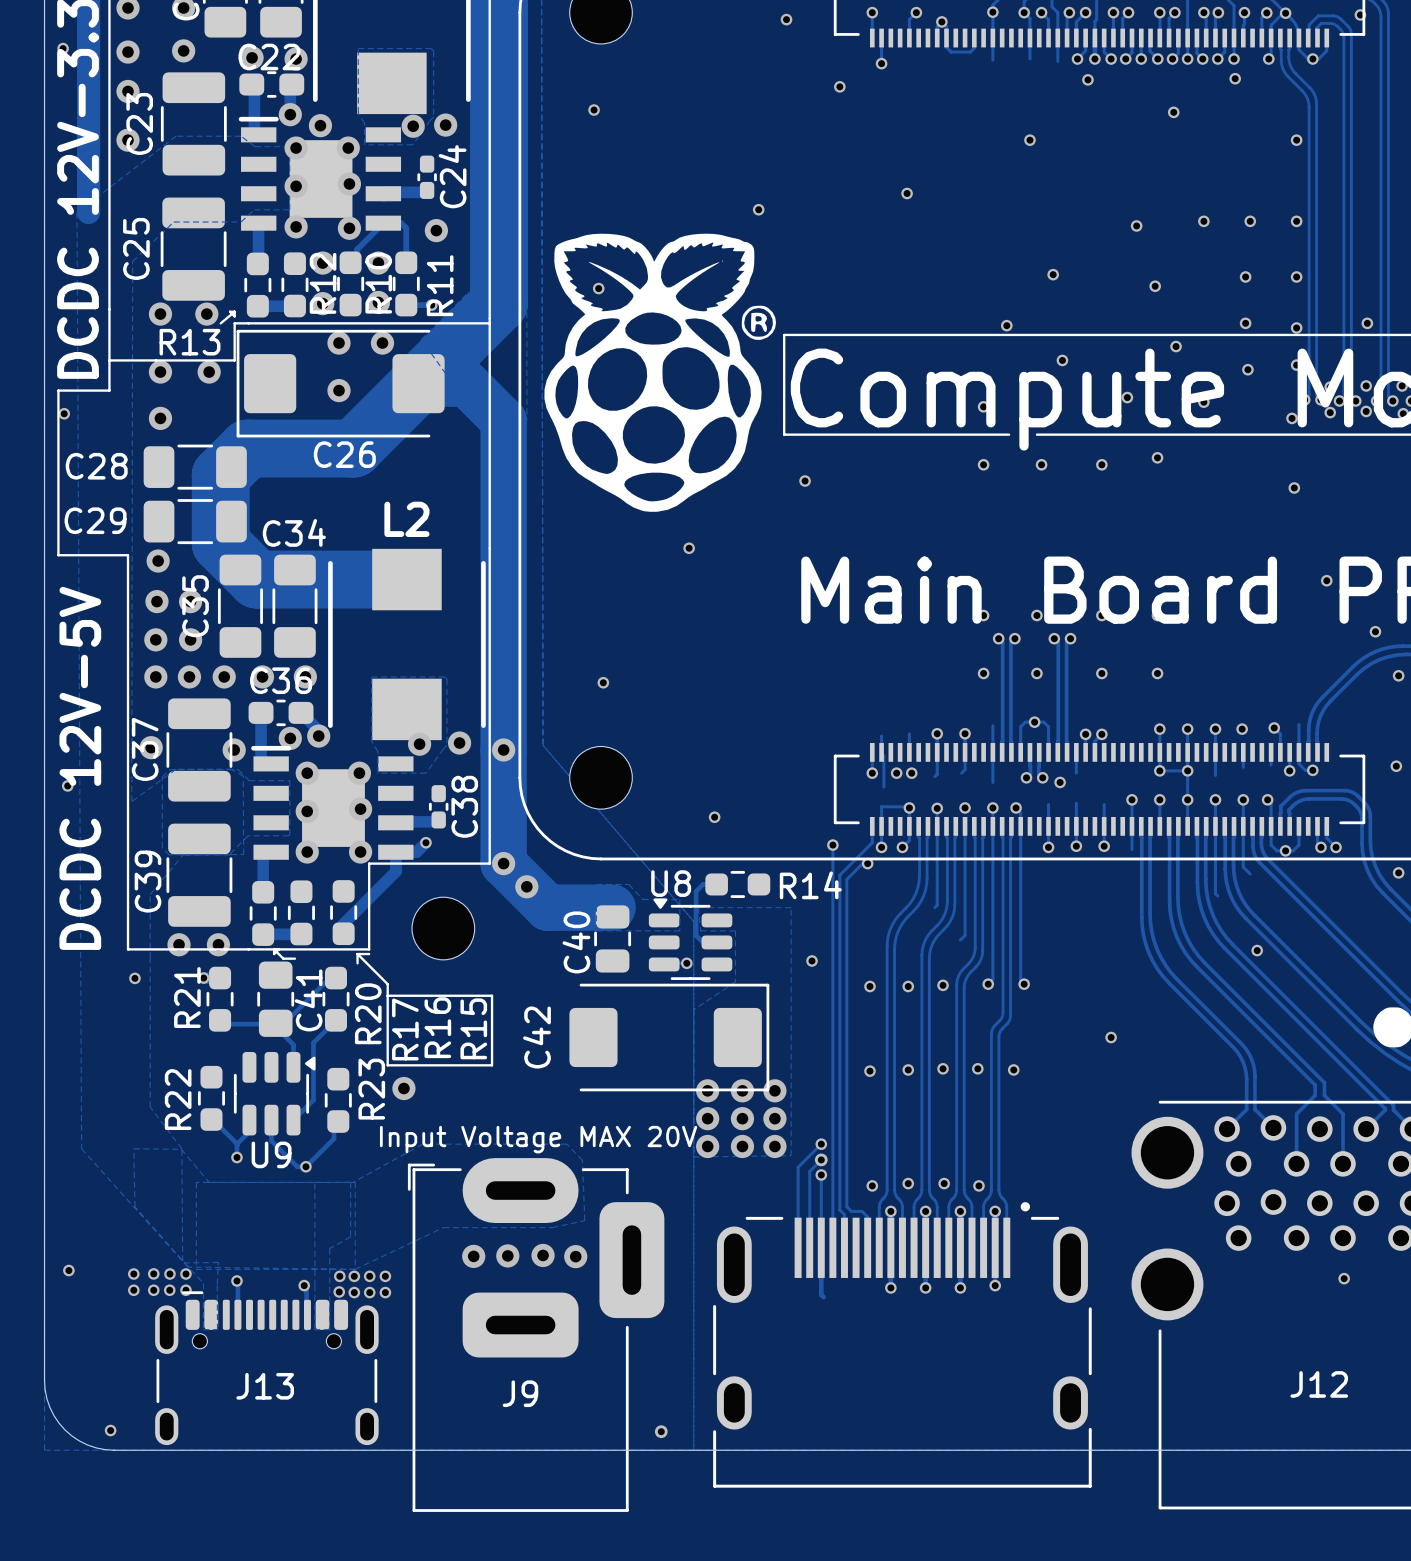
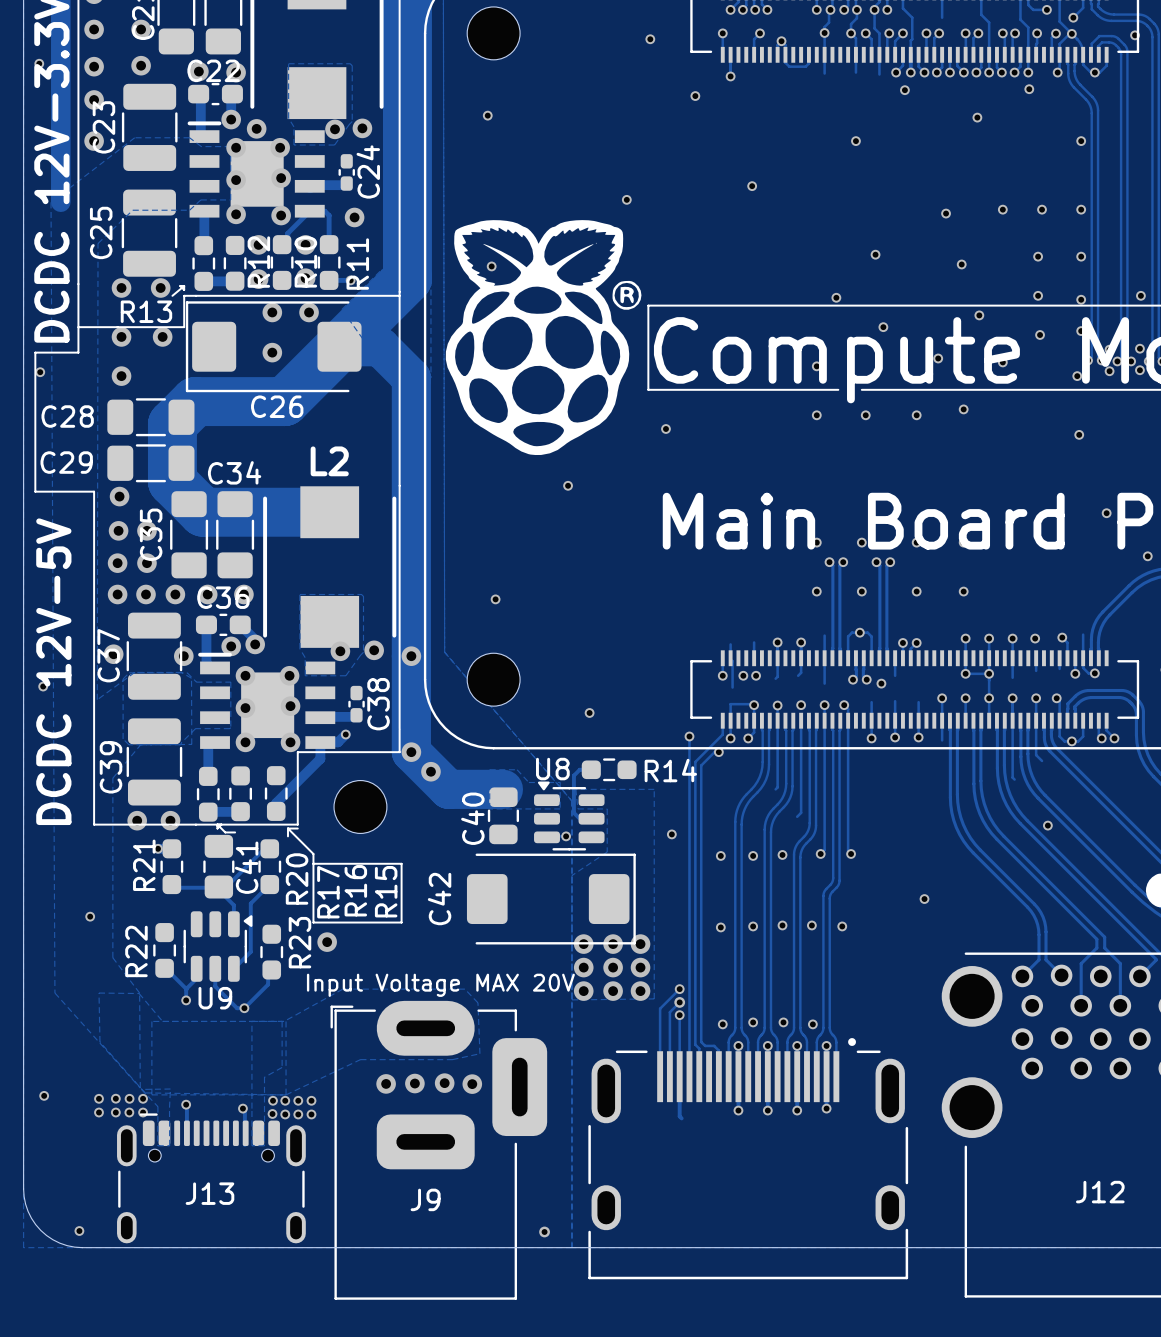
via position: (134, 978) -> (90, 916)
via: (1344, 1278) -> none

